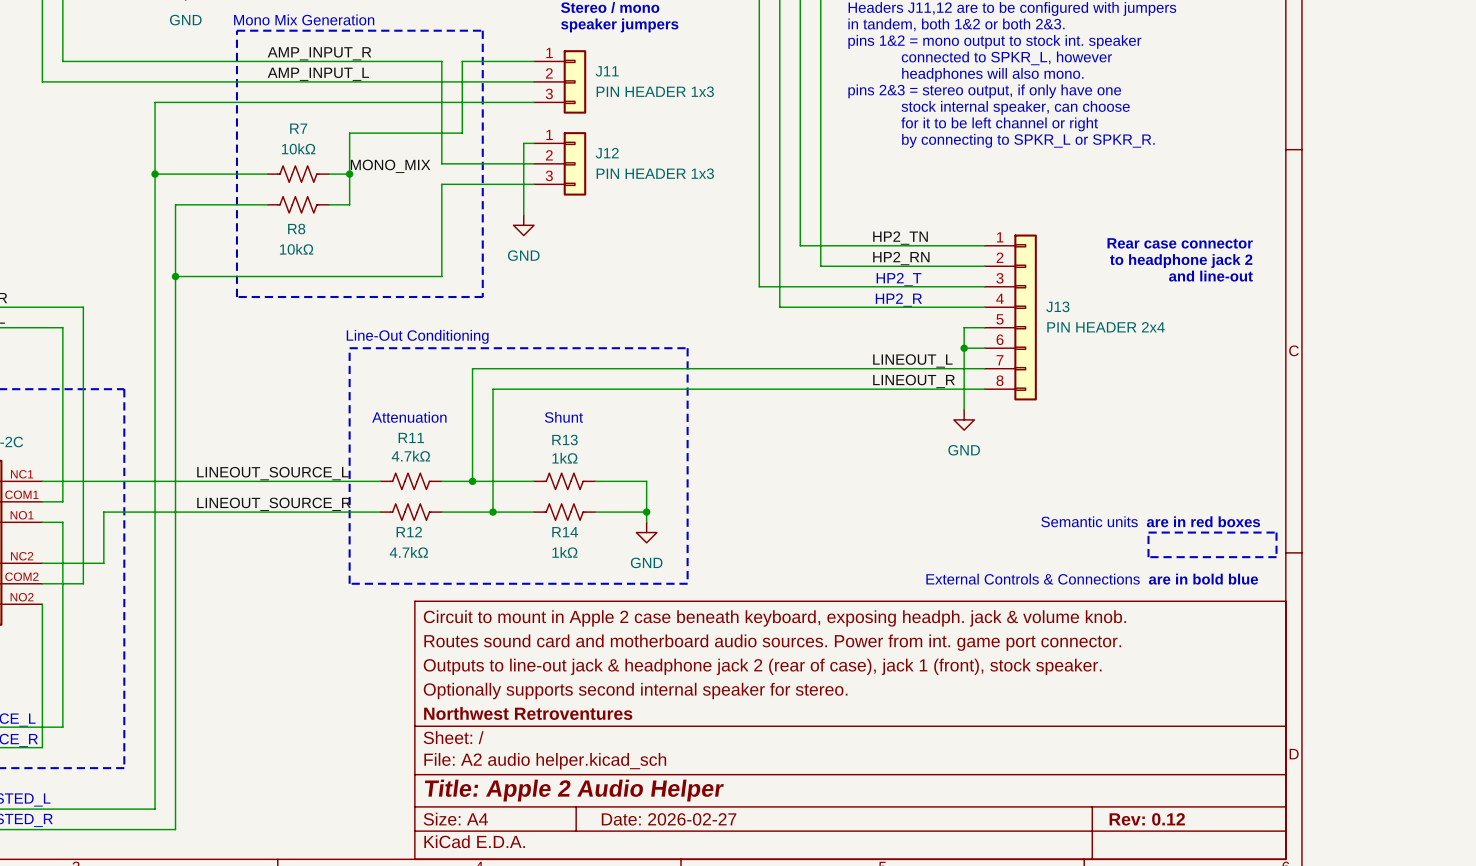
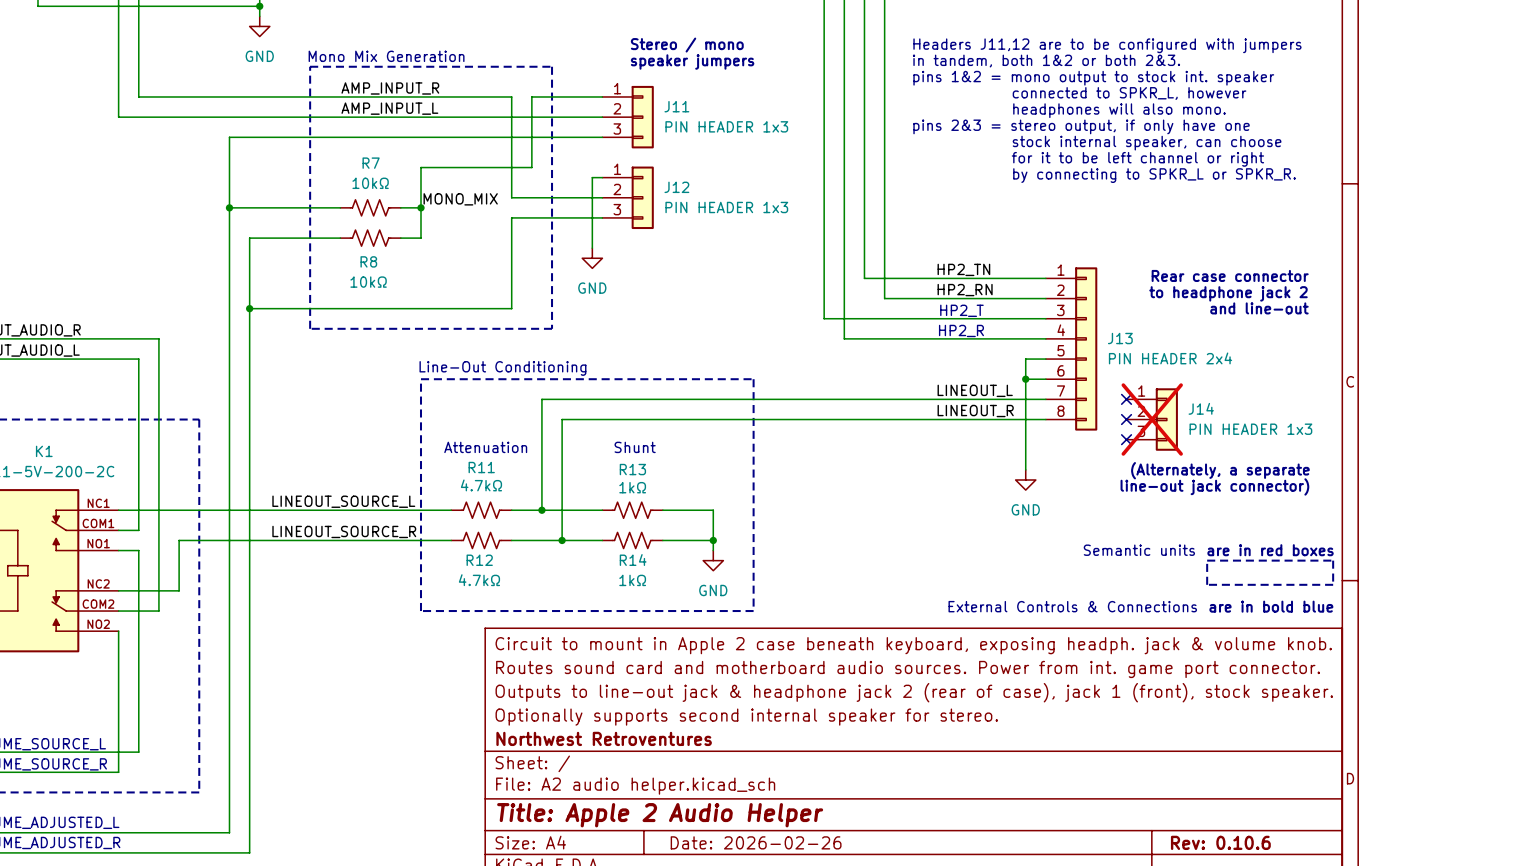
no-connect mark: none -> (1126, 399)
no-connect mark: none -> (1126, 419)
J14: none -> PIN HEADER 1x3 (1152, 419)
wire: none -> (1025, 439) (1025, 469)
no-connect mark: none -> (1126, 439)
power symbol position: GND (964, 419) -> GND (1025, 480)
text: none -> (Alternately, a separate (1220, 470)
text: none -> line-out jack connector) (1214, 486)
title block: Date: 2026-02-27 (669, 819) -> Date: 2026-02-26 (756, 842)
title block: Rev: 0.12 (1147, 819) -> Rev: 0.10.6 (1220, 842)

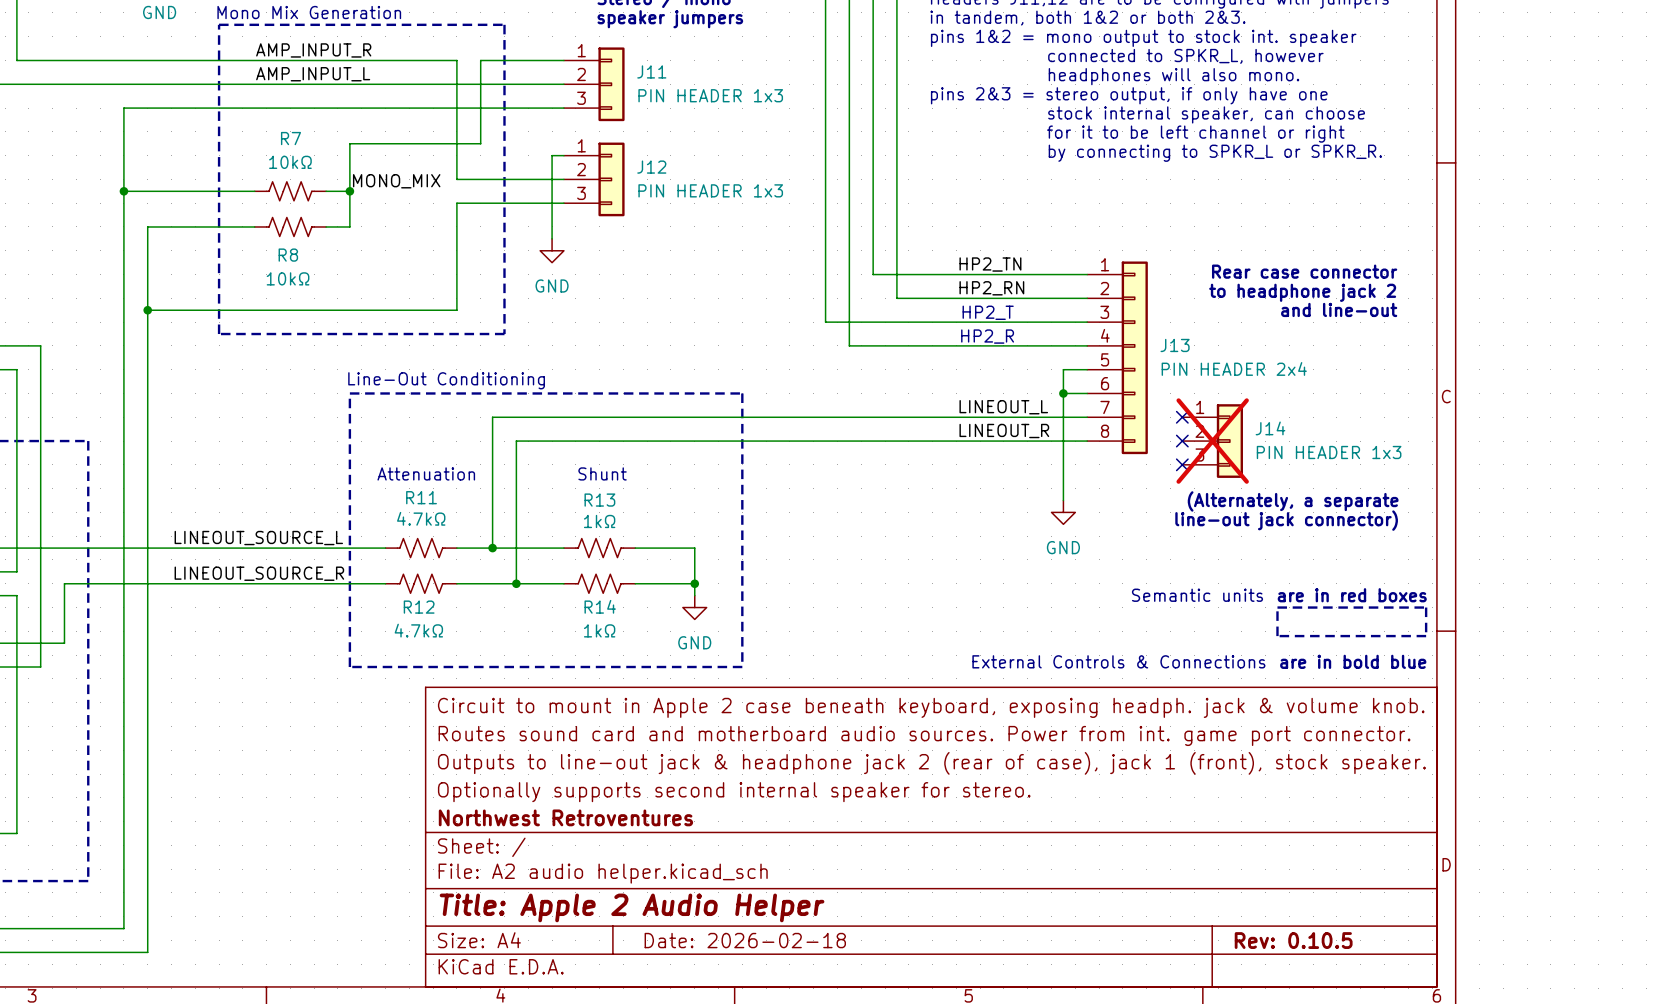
title block: Date: 2026-02-26 (756, 842) -> Date: 2026-02-18 (745, 940)
title block: Rev: 0.10.6 (1220, 842) -> Rev: 0.10.5 (1293, 940)

